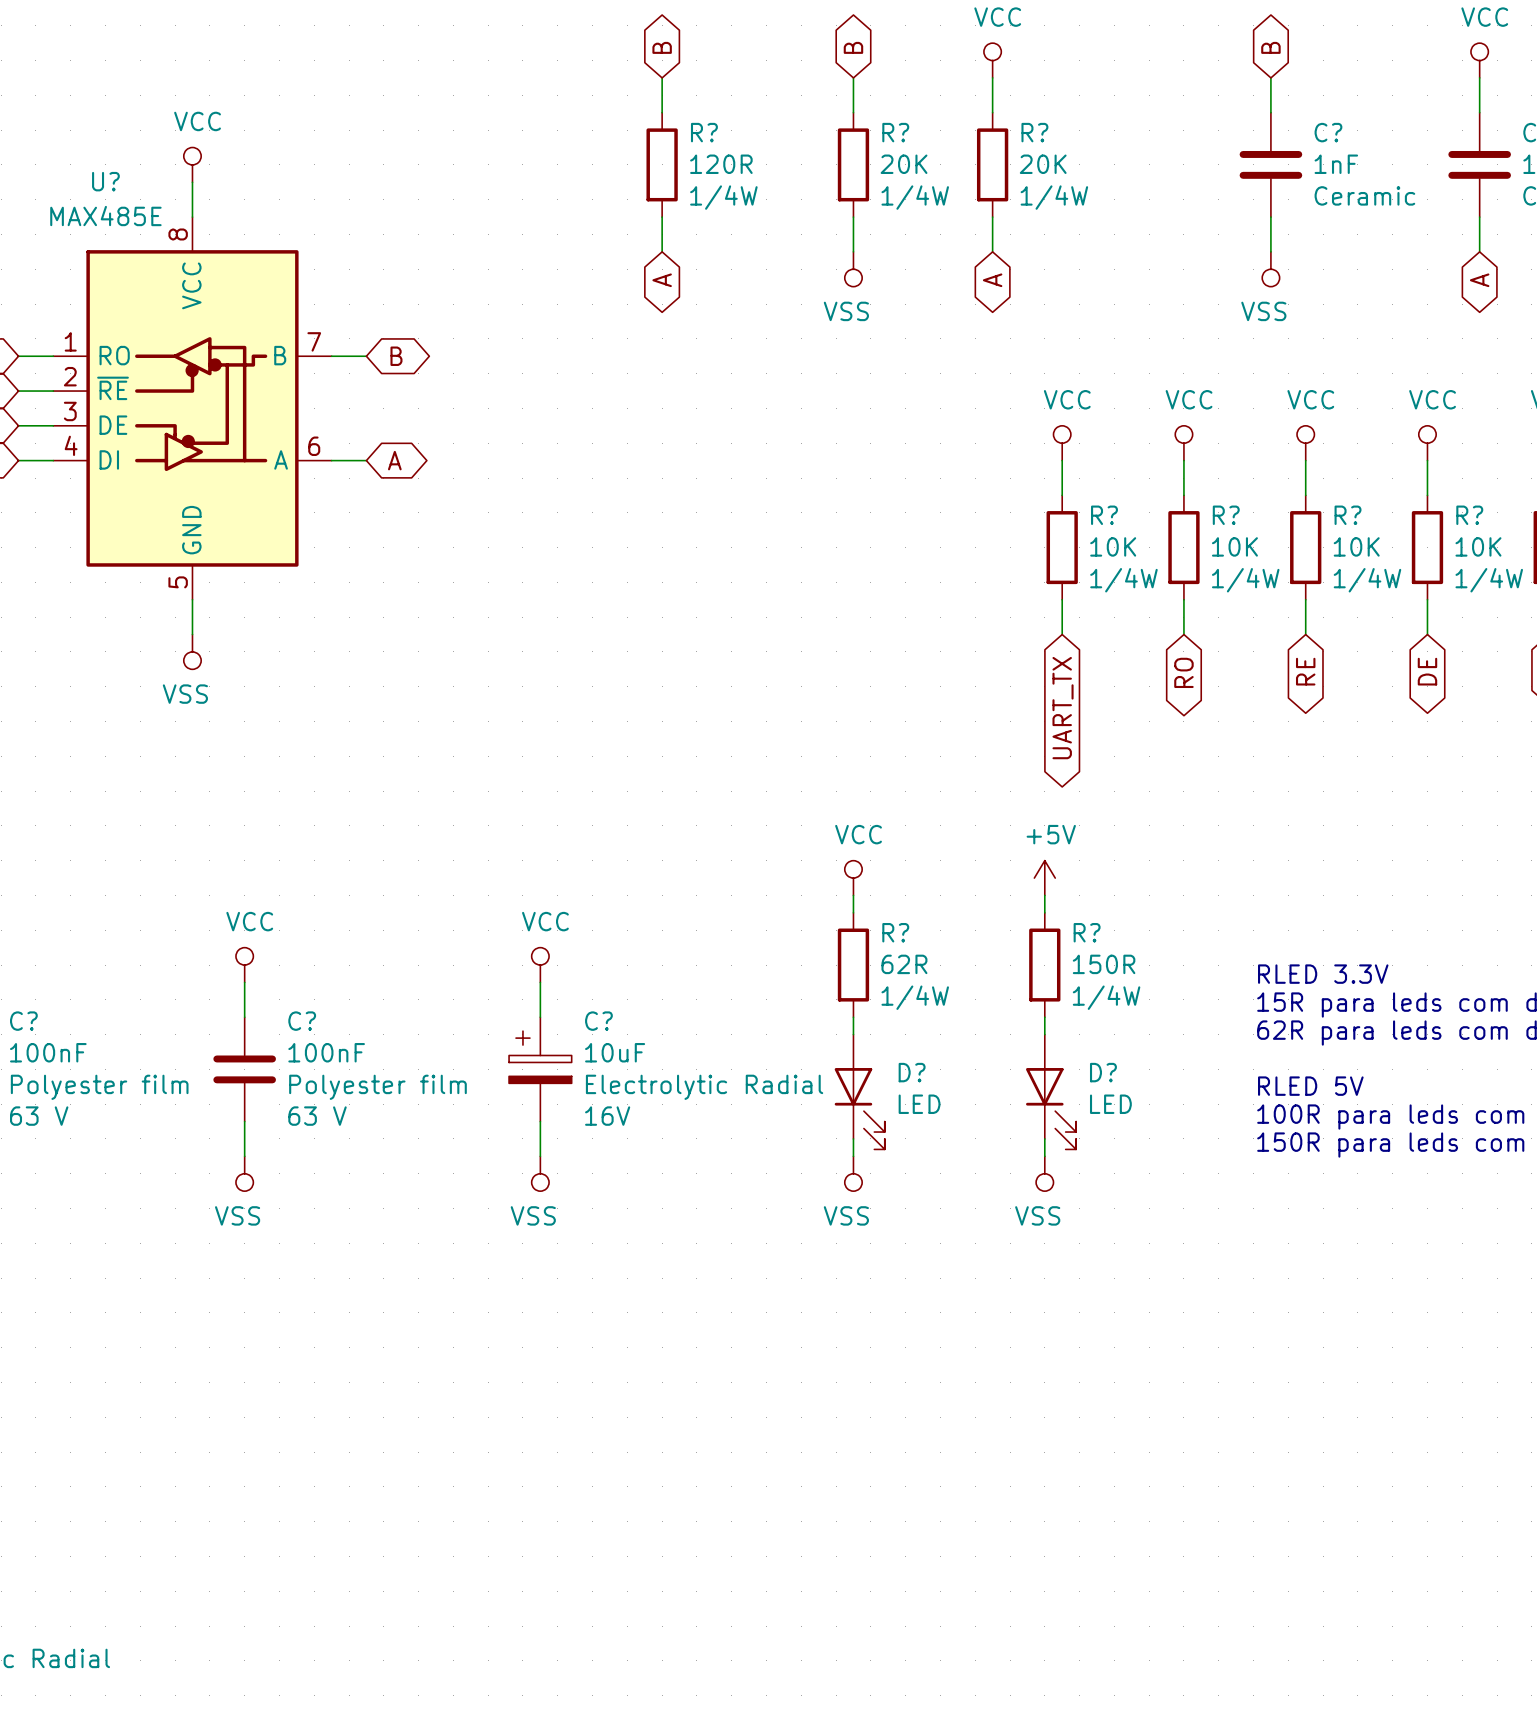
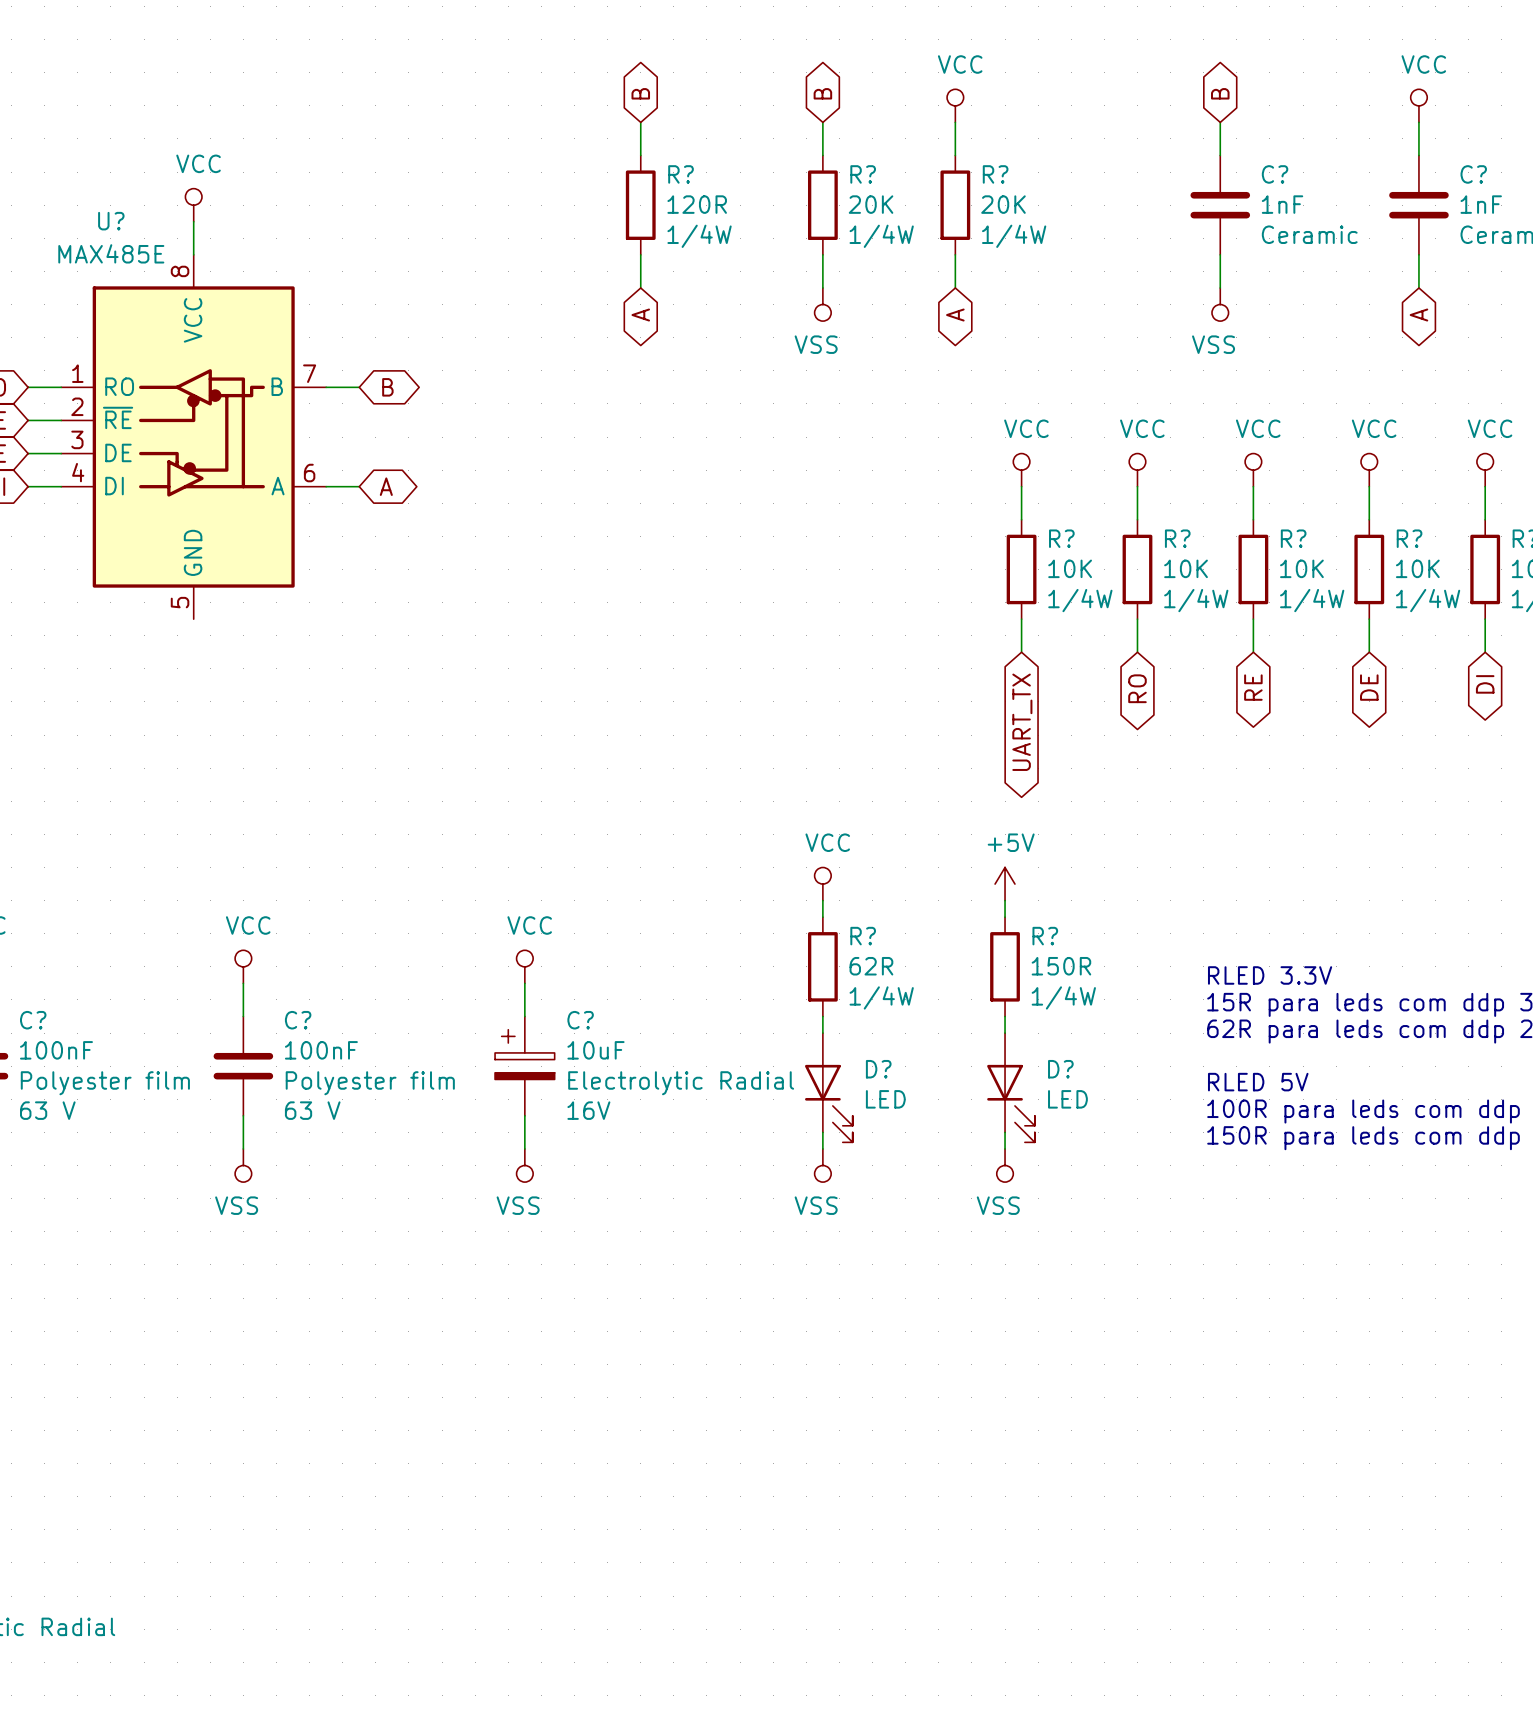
wire: (192, 599) (192, 634) -> none
power symbol: VSS (192, 651) -> none

